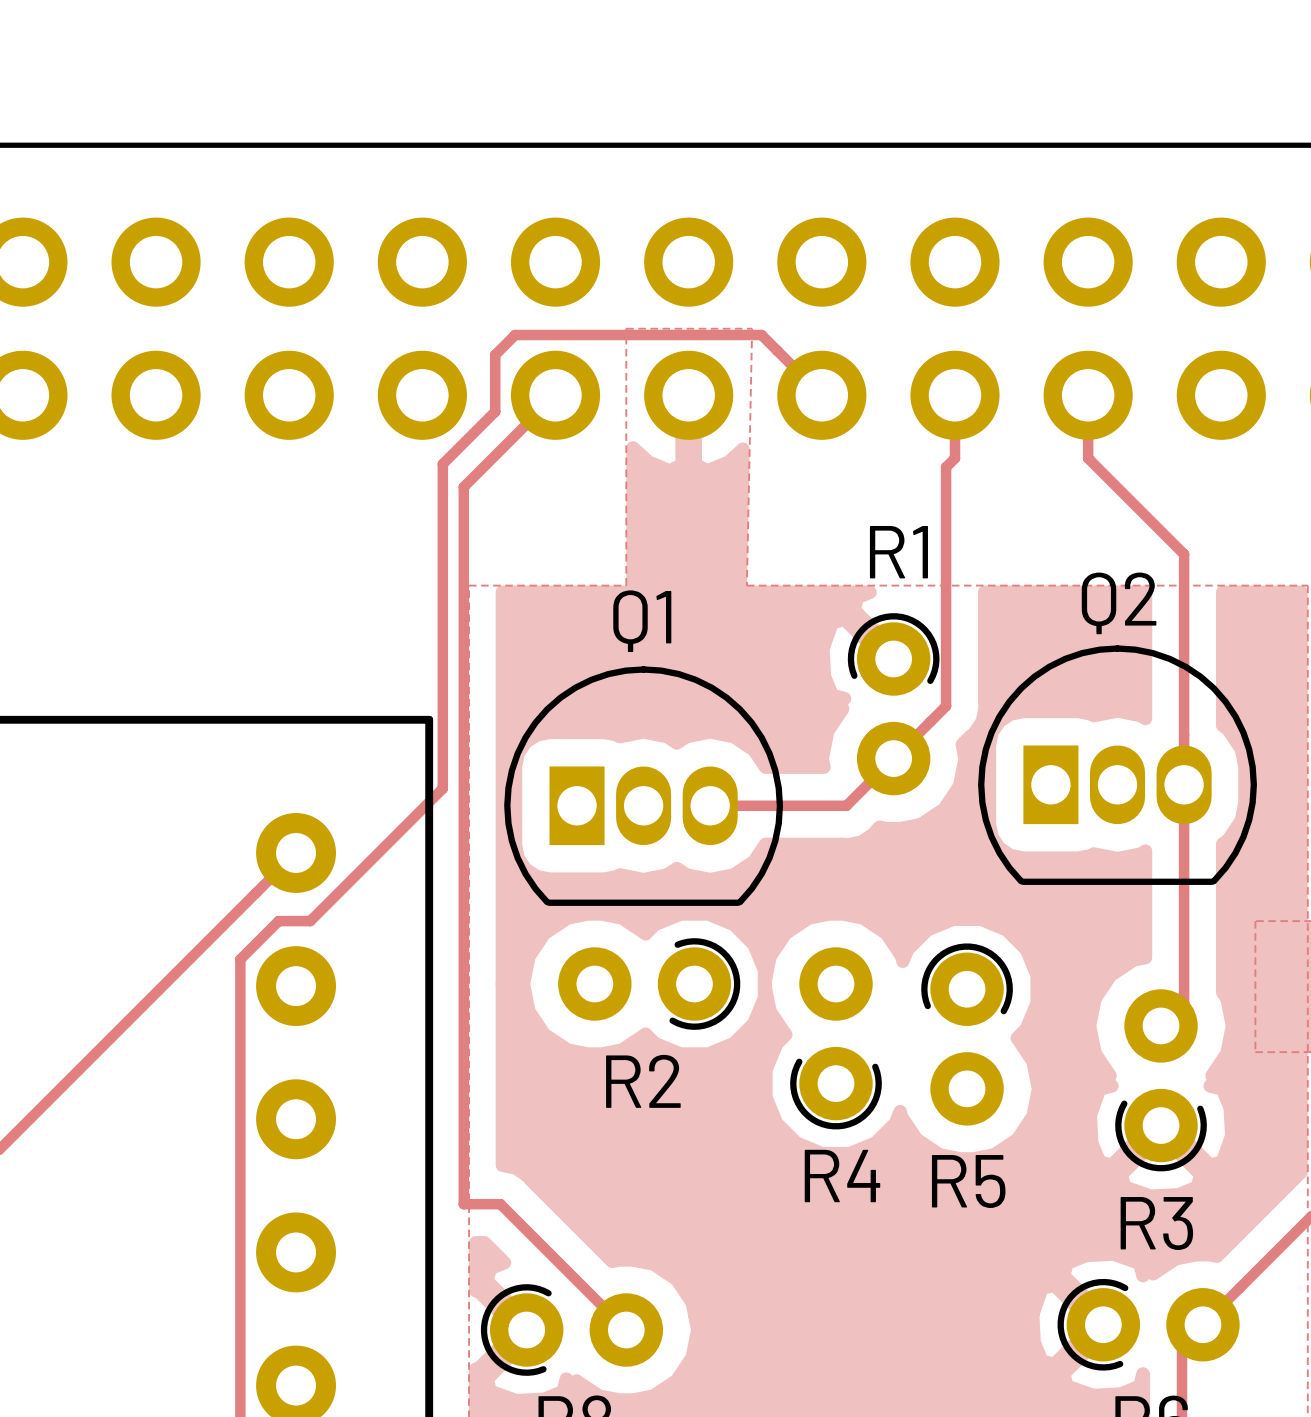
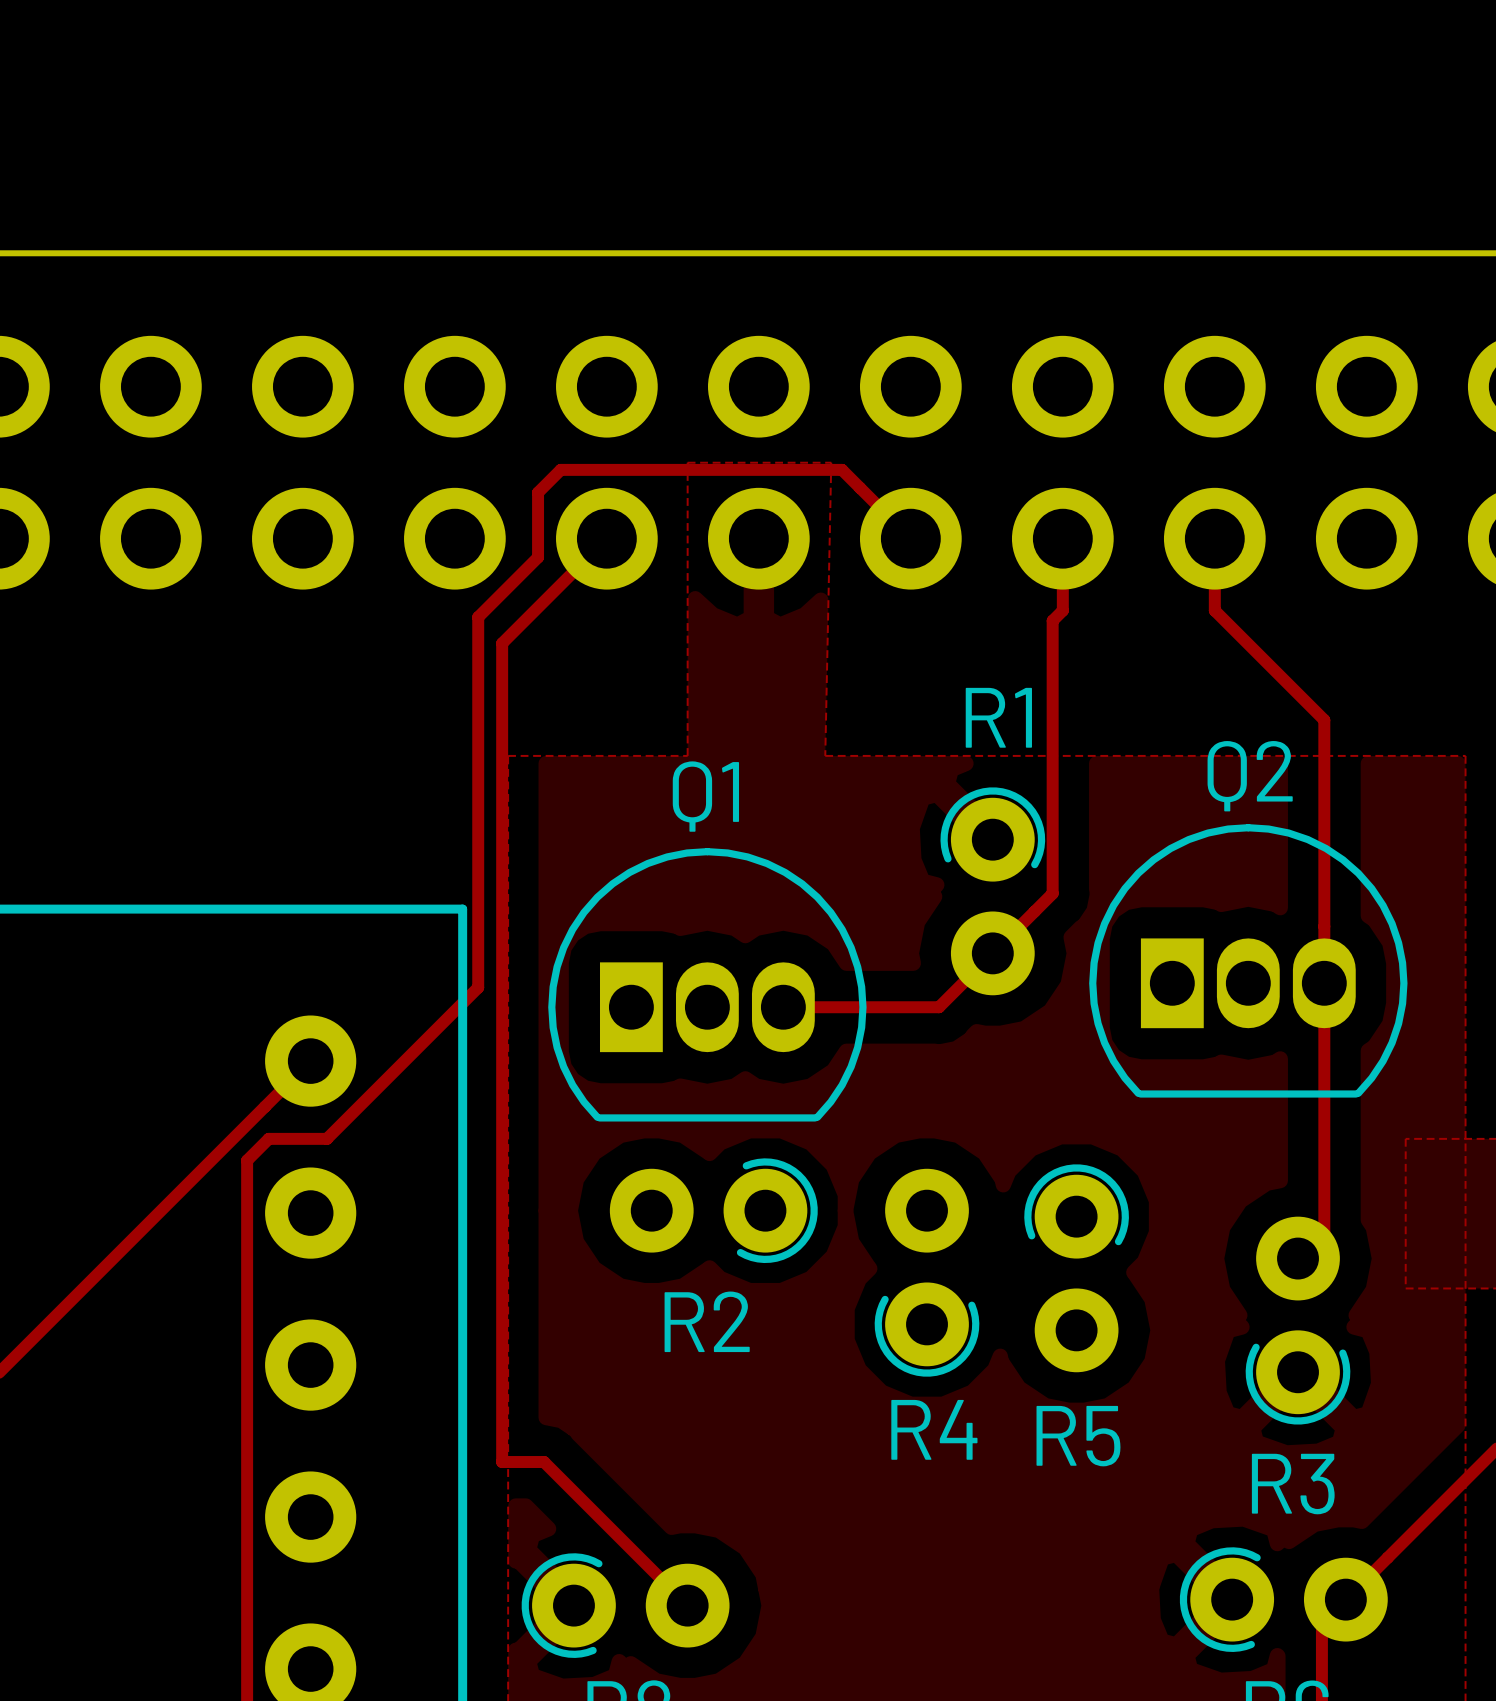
track: (278, 921) (240, 959) -> (290, 1138) (268, 1138) (247, 1160) (247, 1182)

